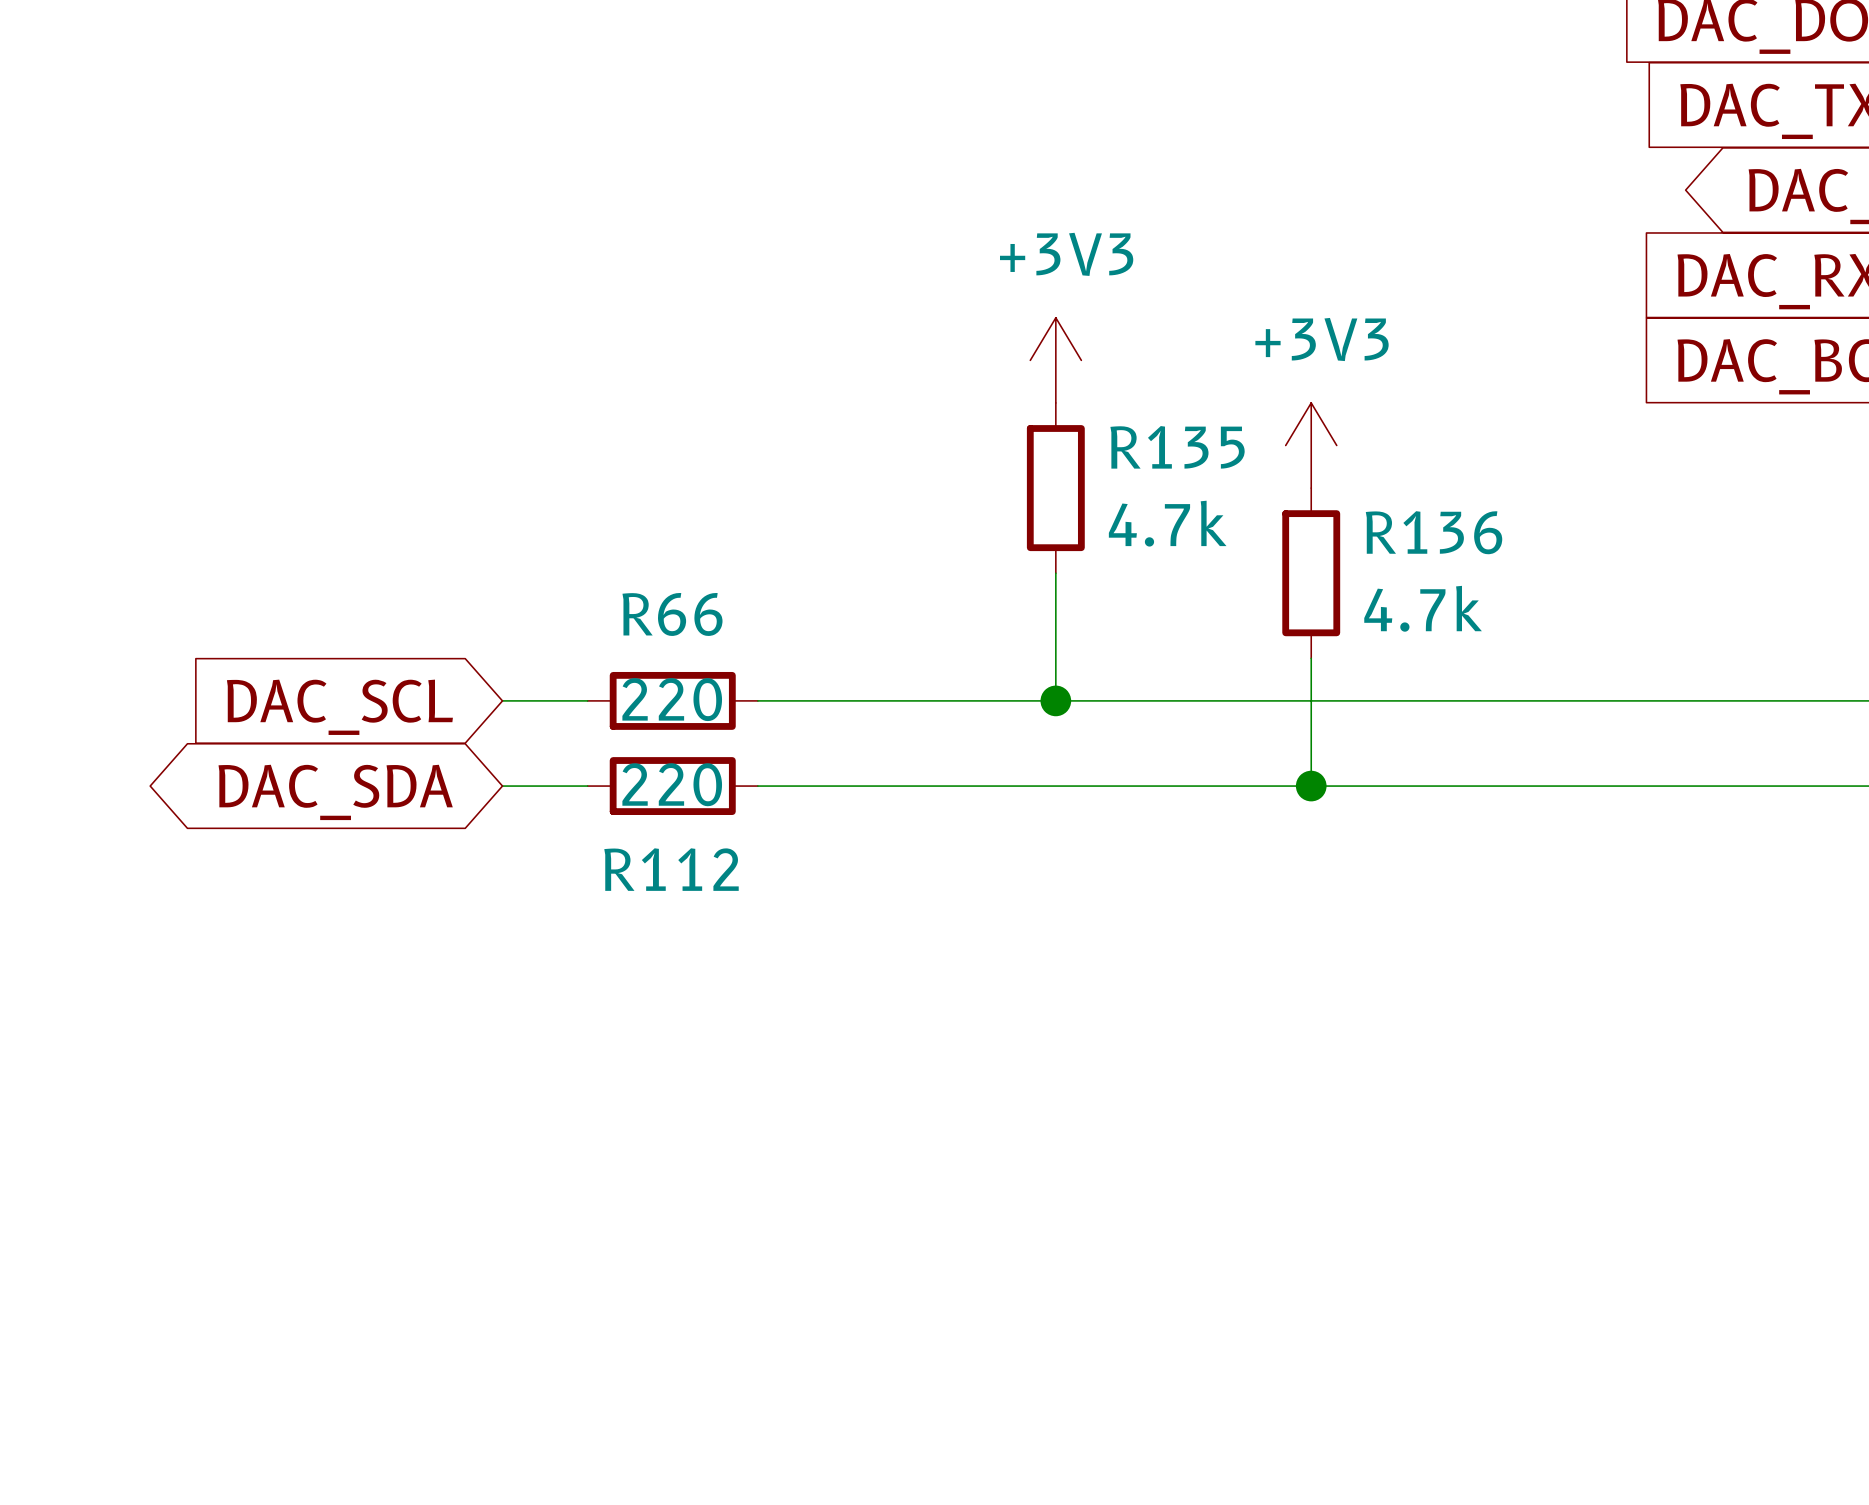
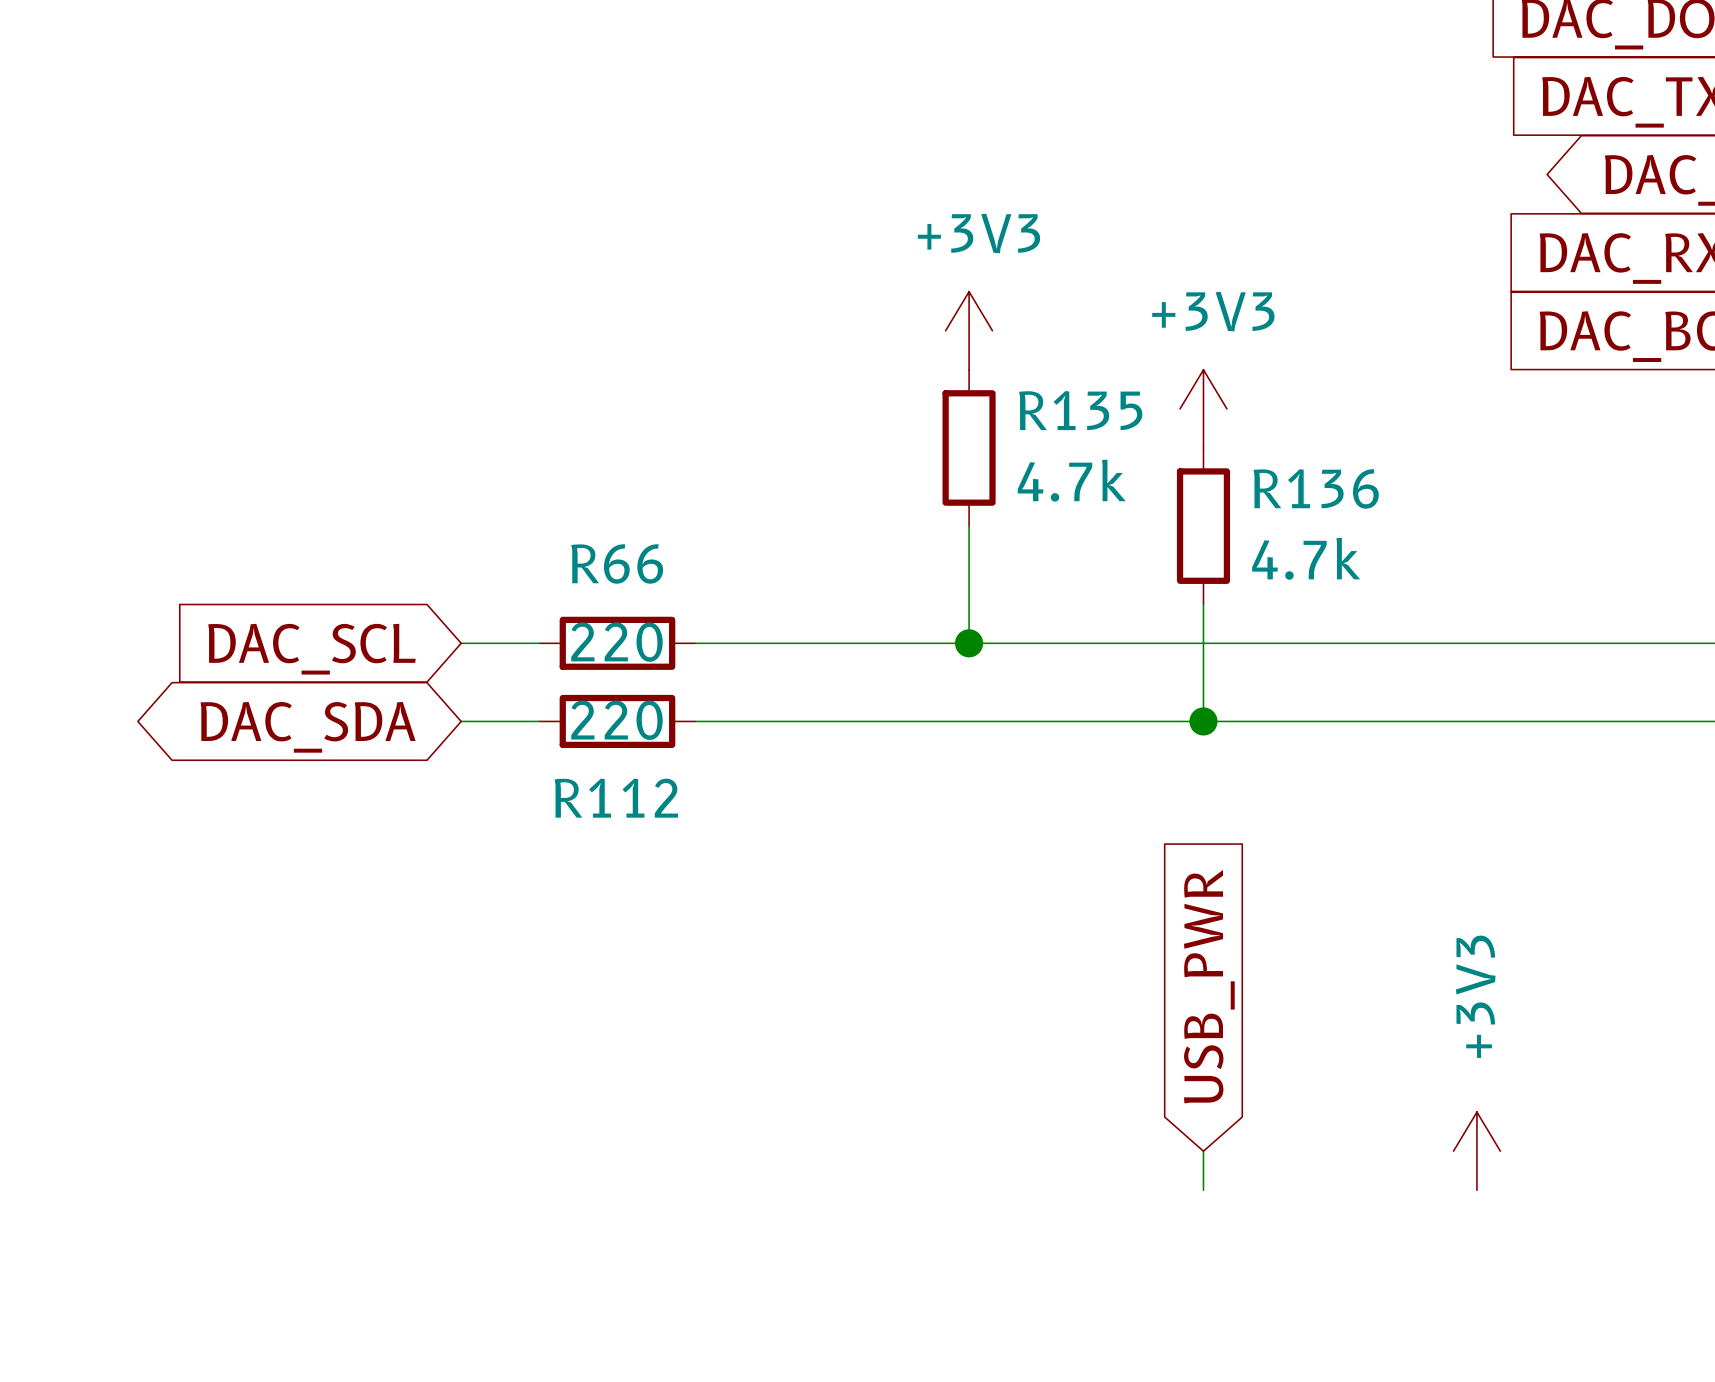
global label: none -> USB_PWR (1209, 986)
wire: none -> (1203, 1151) (1203, 1190)
power symbol: none -> +3V3 (1476, 1151)

